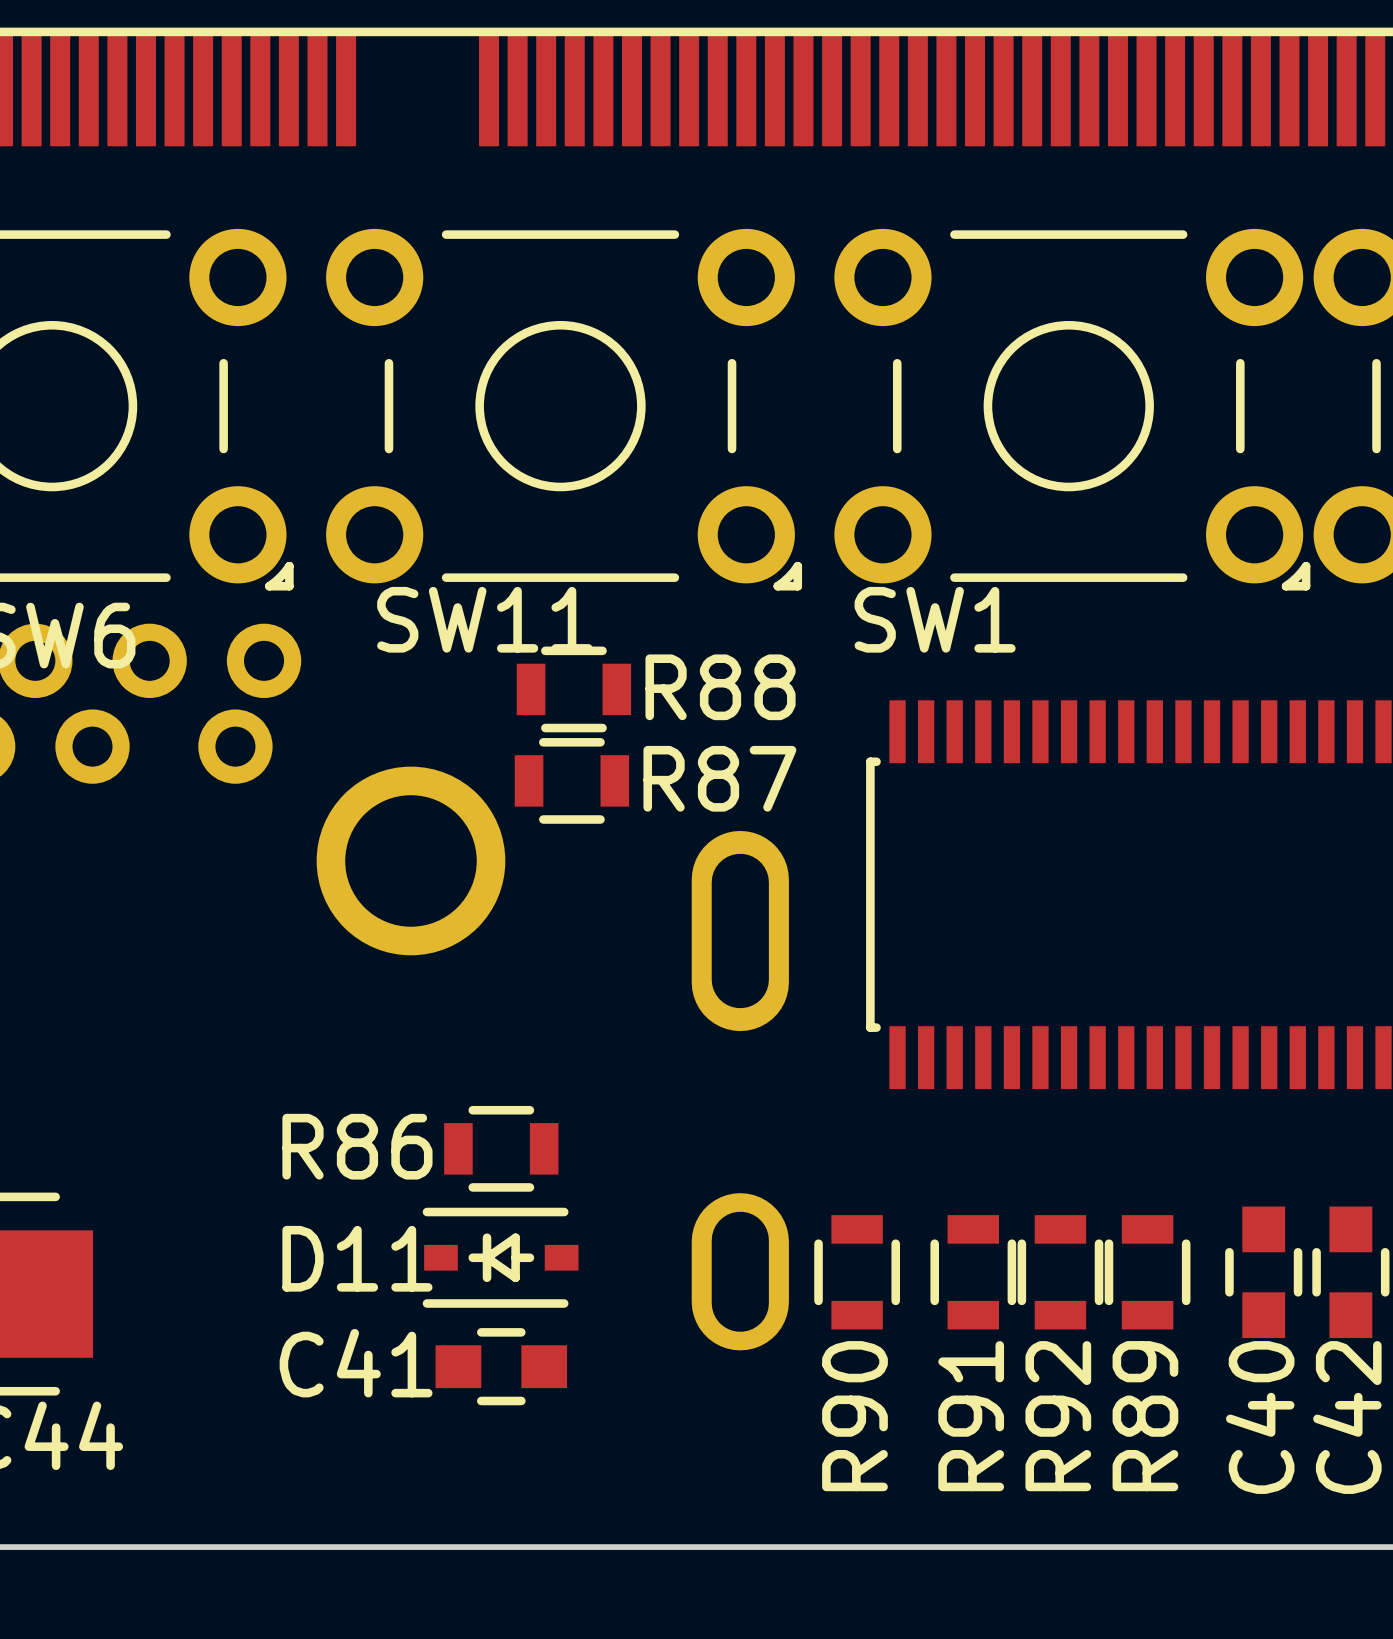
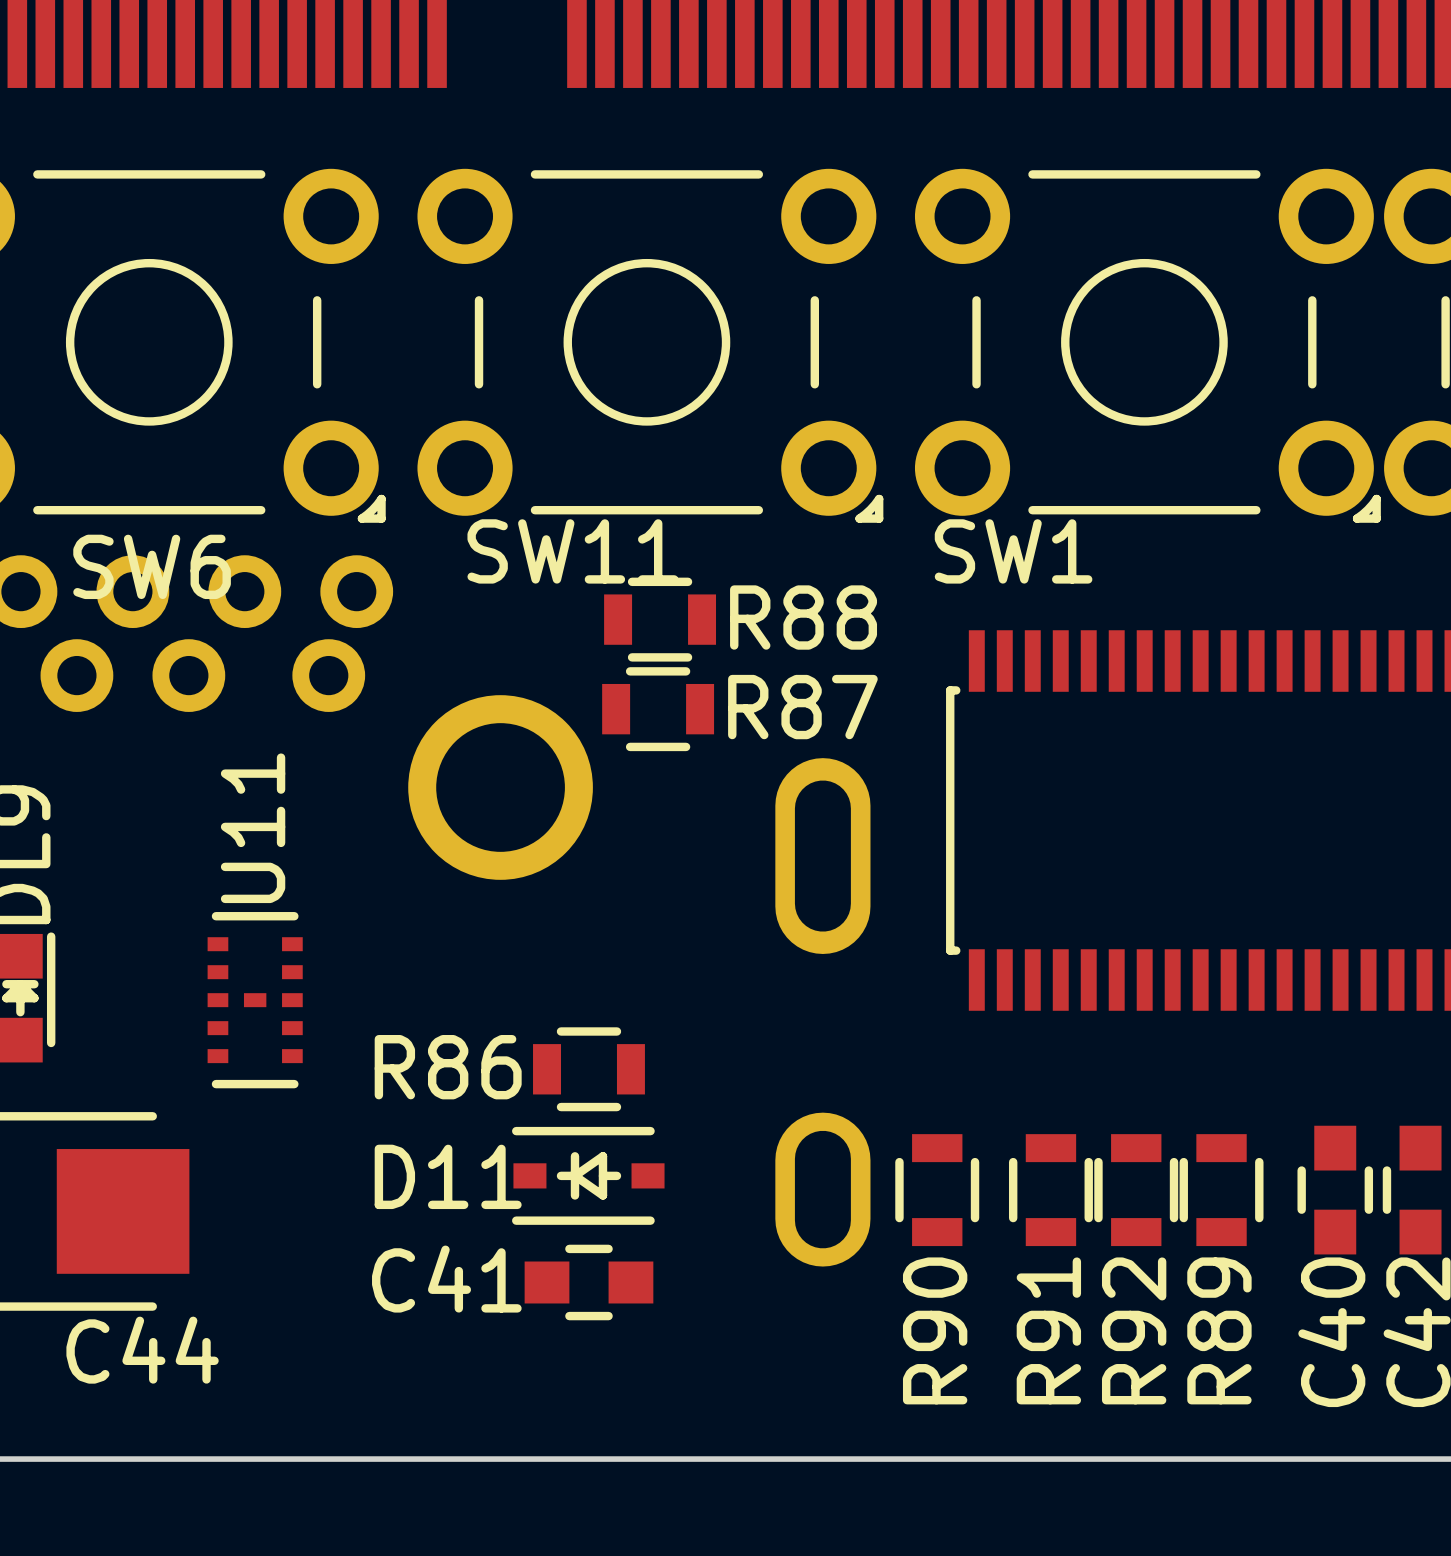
U11: none -> (255, 1000)

